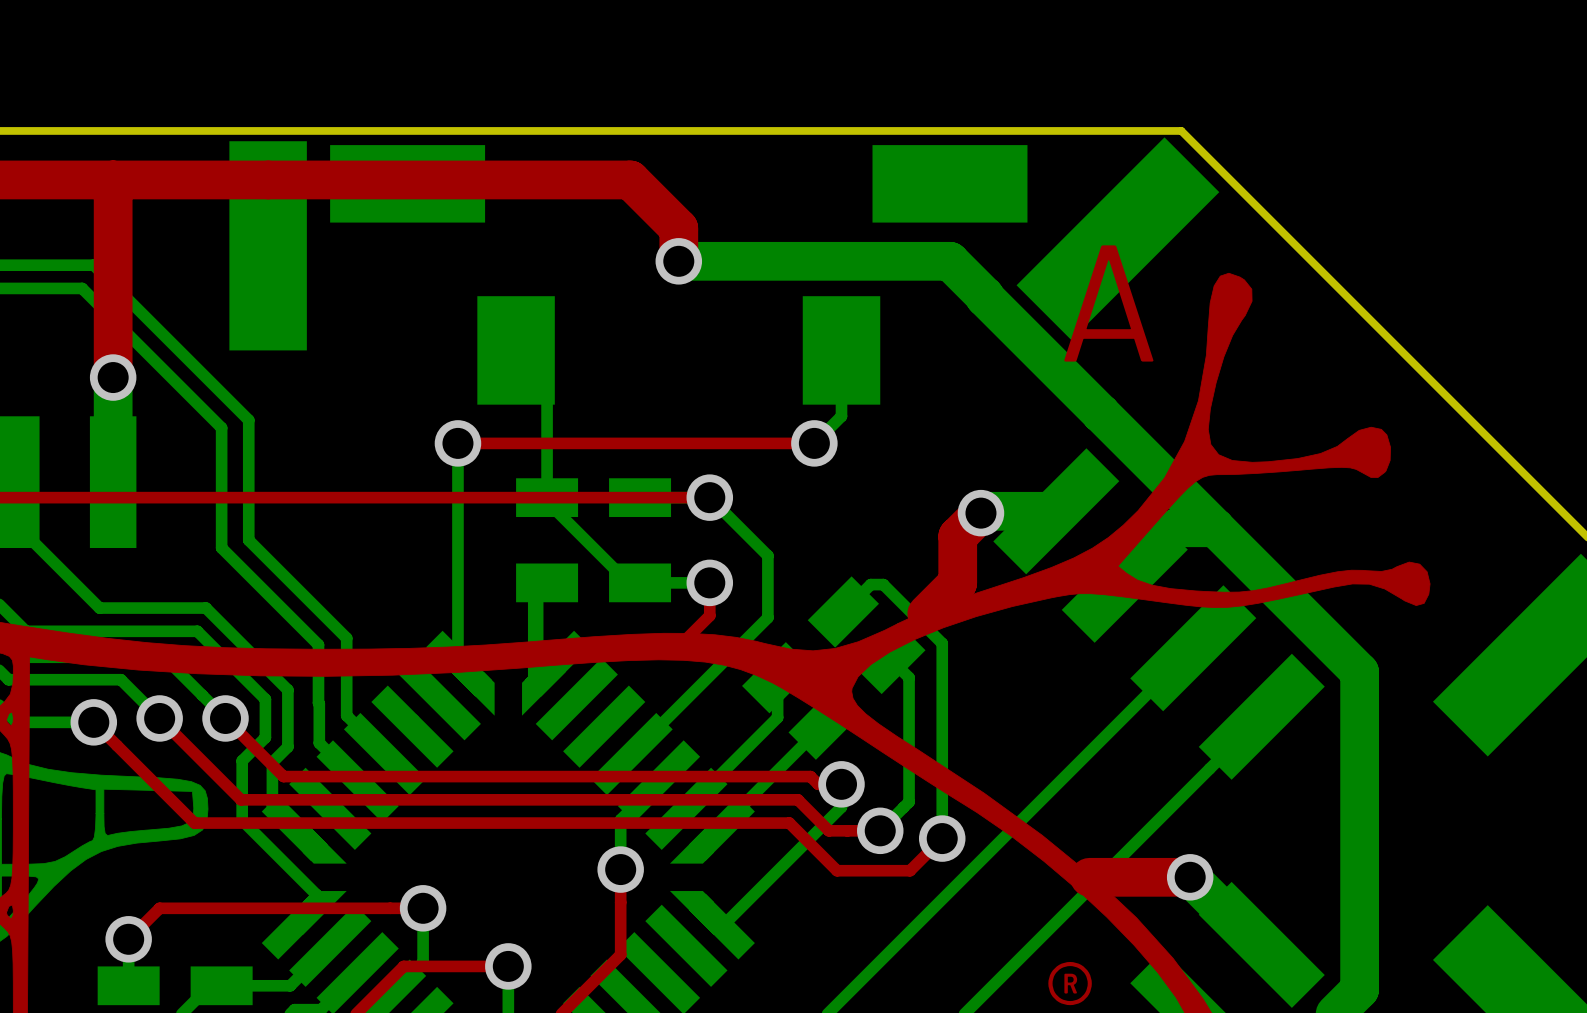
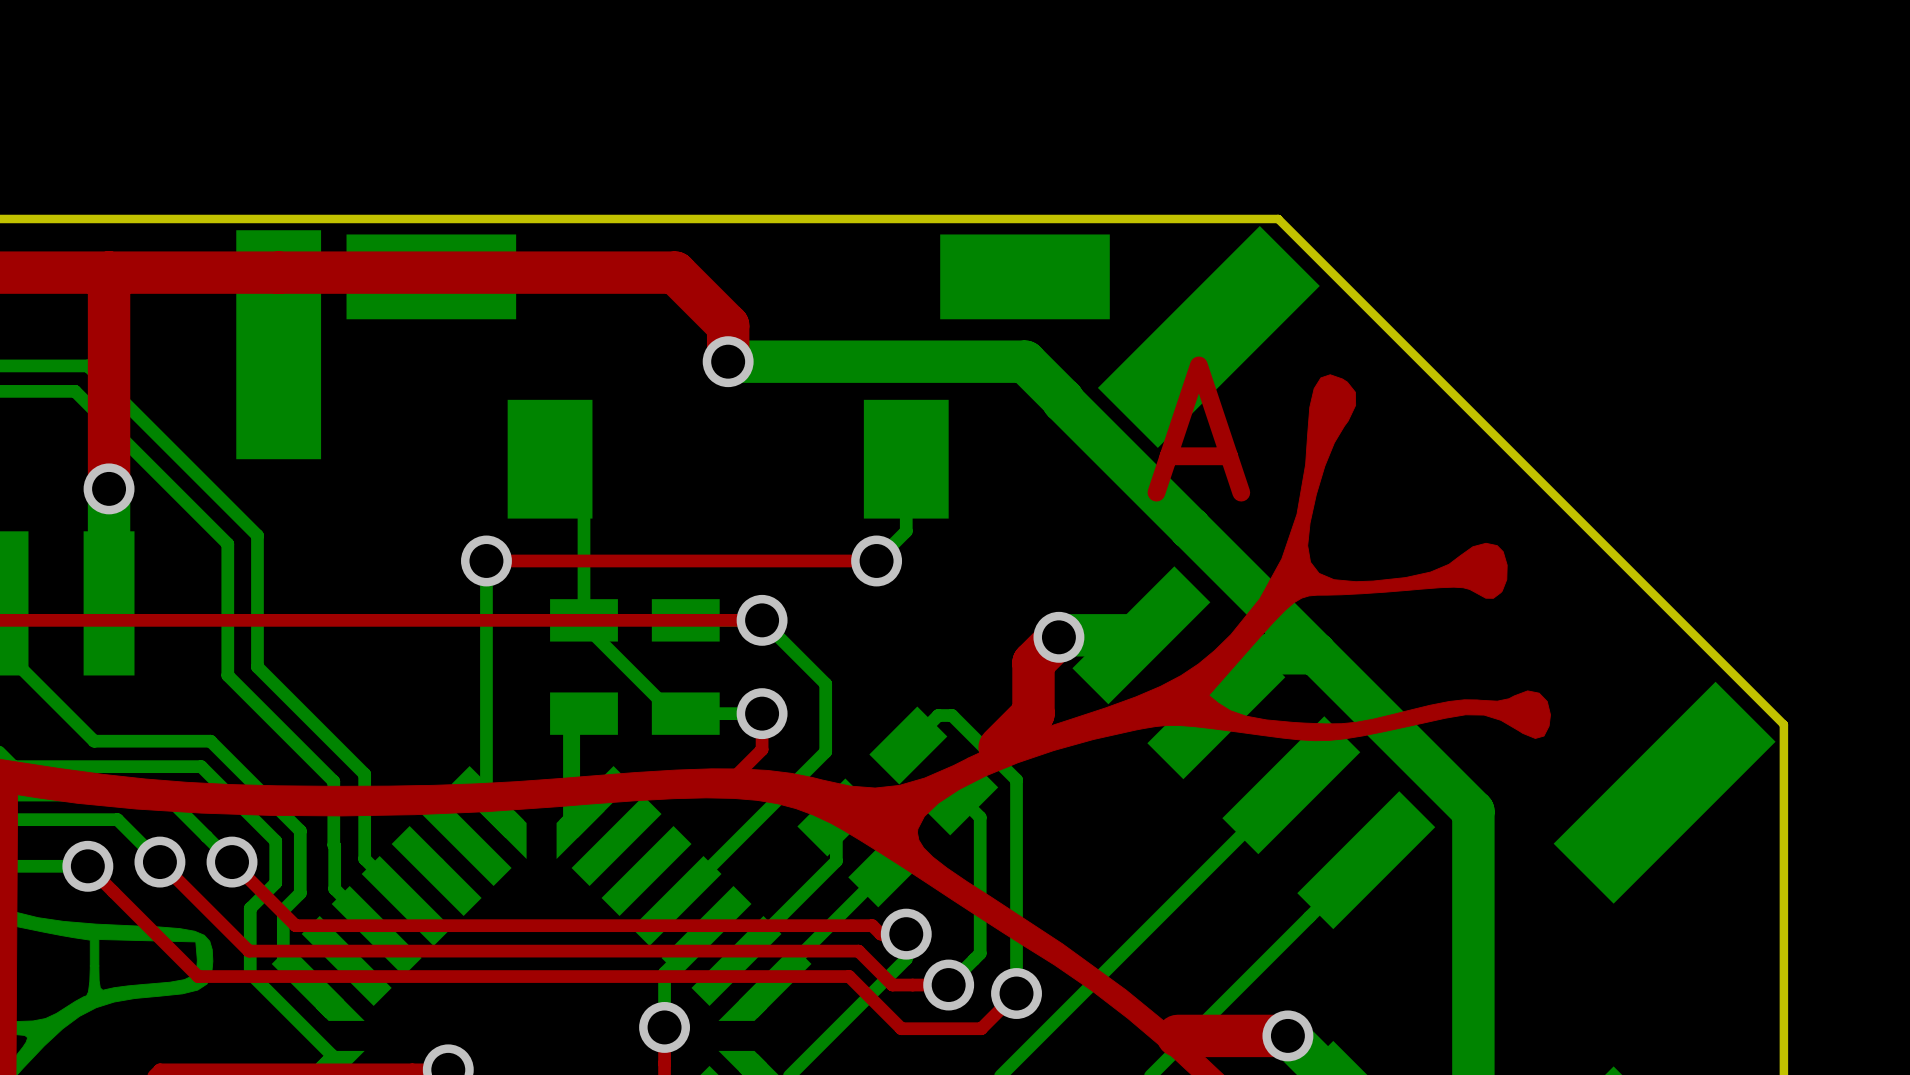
text position: A (1108, 303) -> A (1198, 429)

